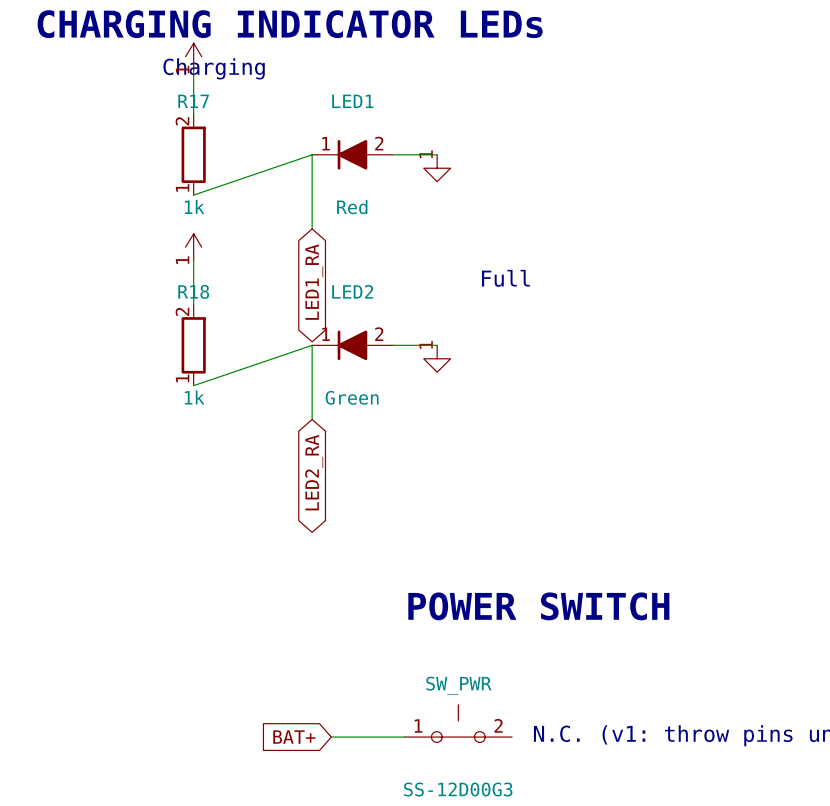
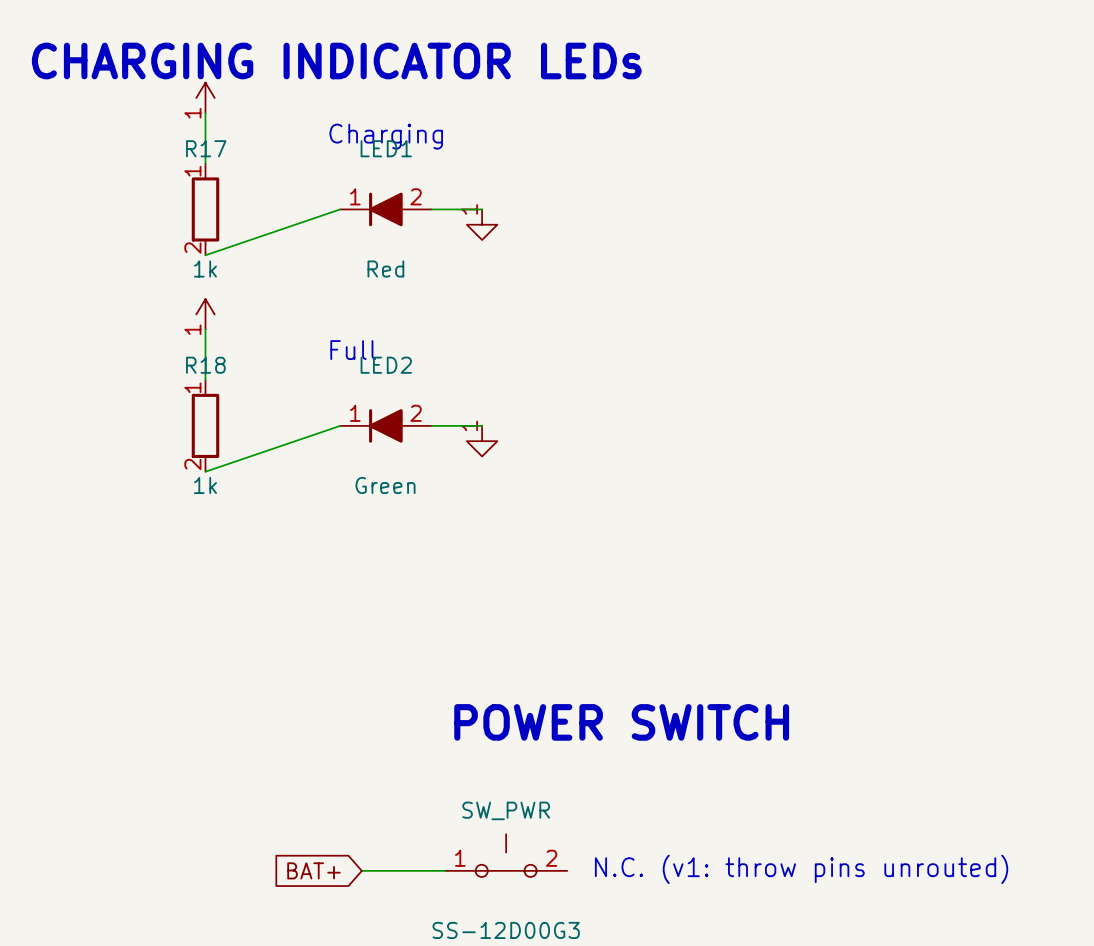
text position: Charging (214, 68) -> Charging (386, 136)
R17 rotation: 0° (193, 154) -> 180° (205, 209)
wire: (312, 154) (312, 228) -> none
text position: Full (505, 278) -> Full (353, 350)
global label: LED1_RA (314, 282) -> none
R18 rotation: 0° (193, 345) -> 180° (205, 425)
wire: (312, 345) (312, 419) -> none
global label: LED2_RA (314, 472) -> none

